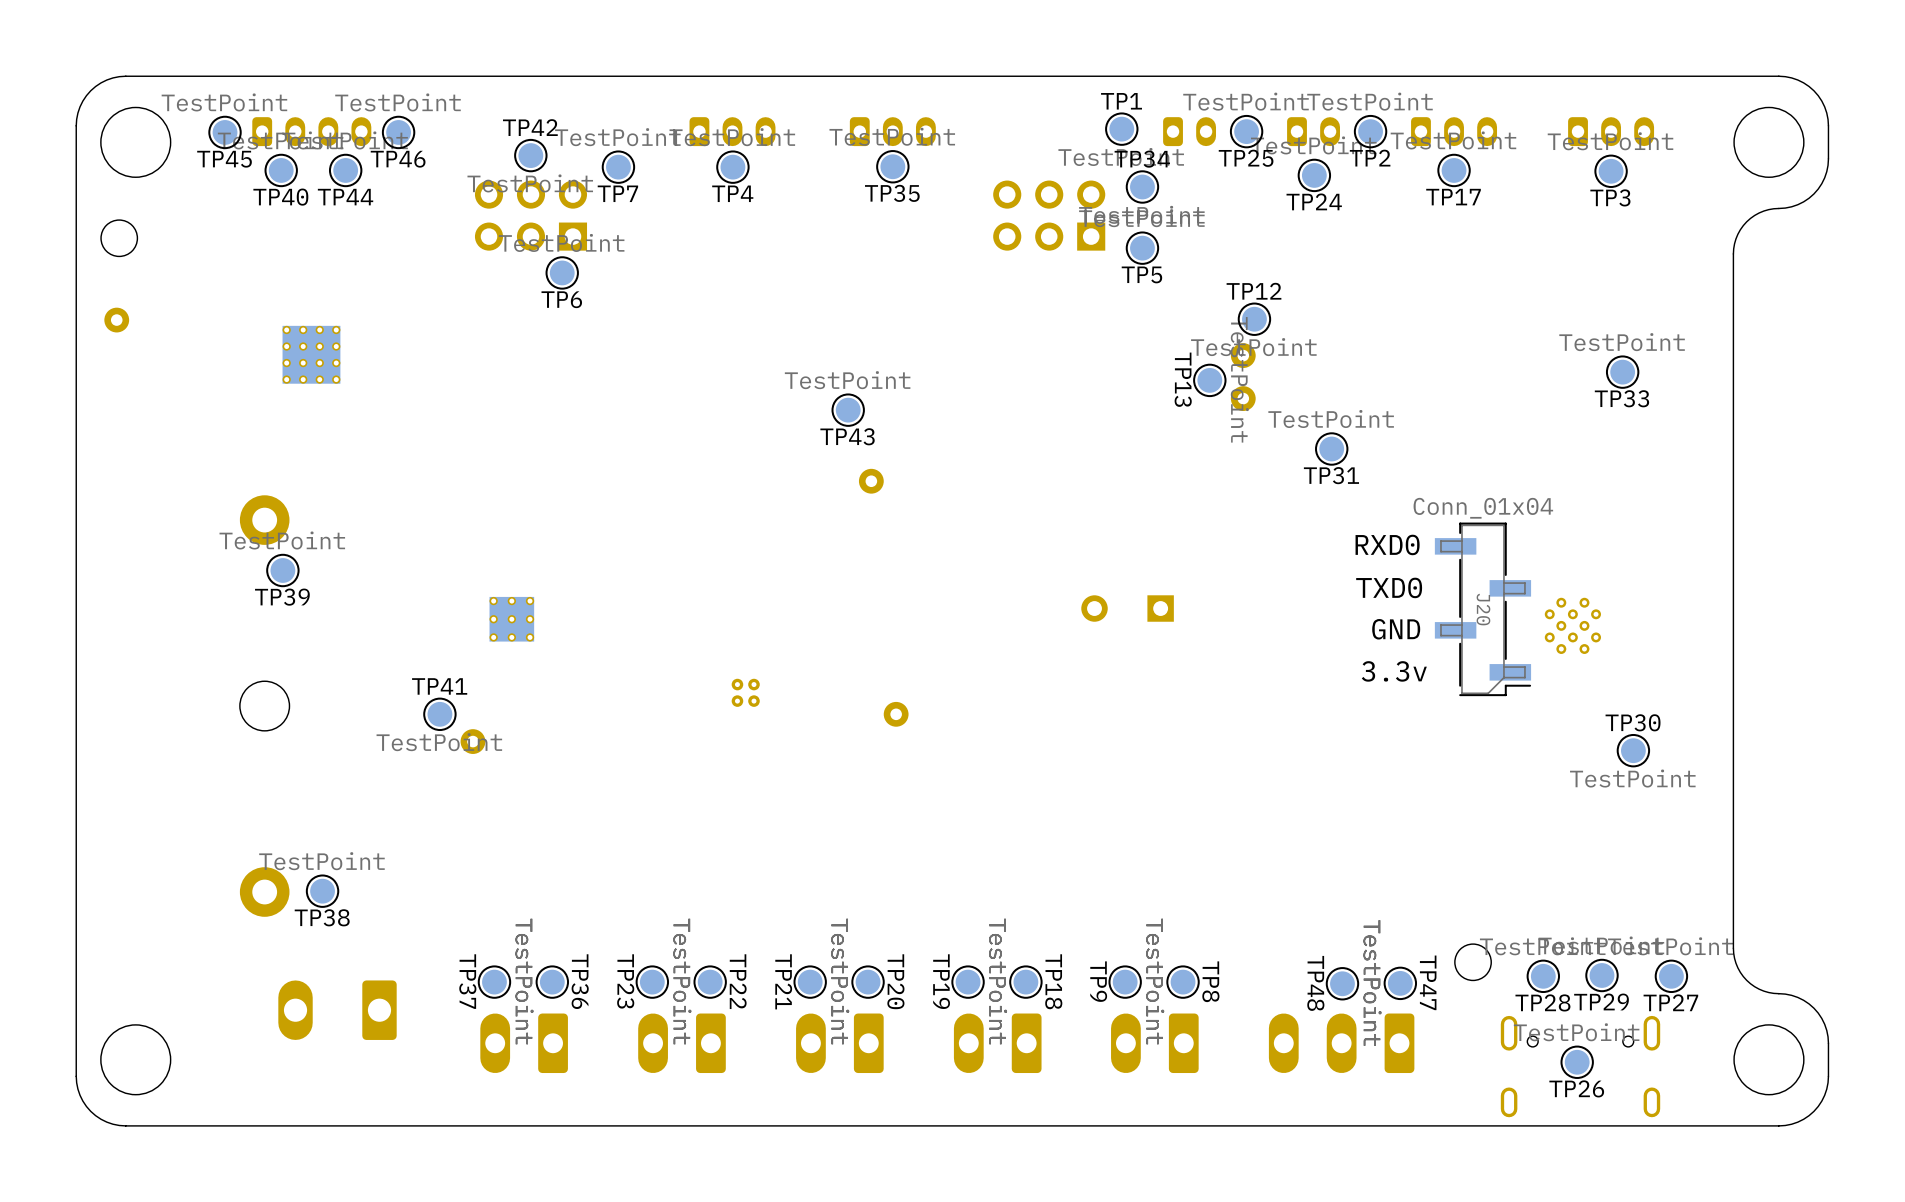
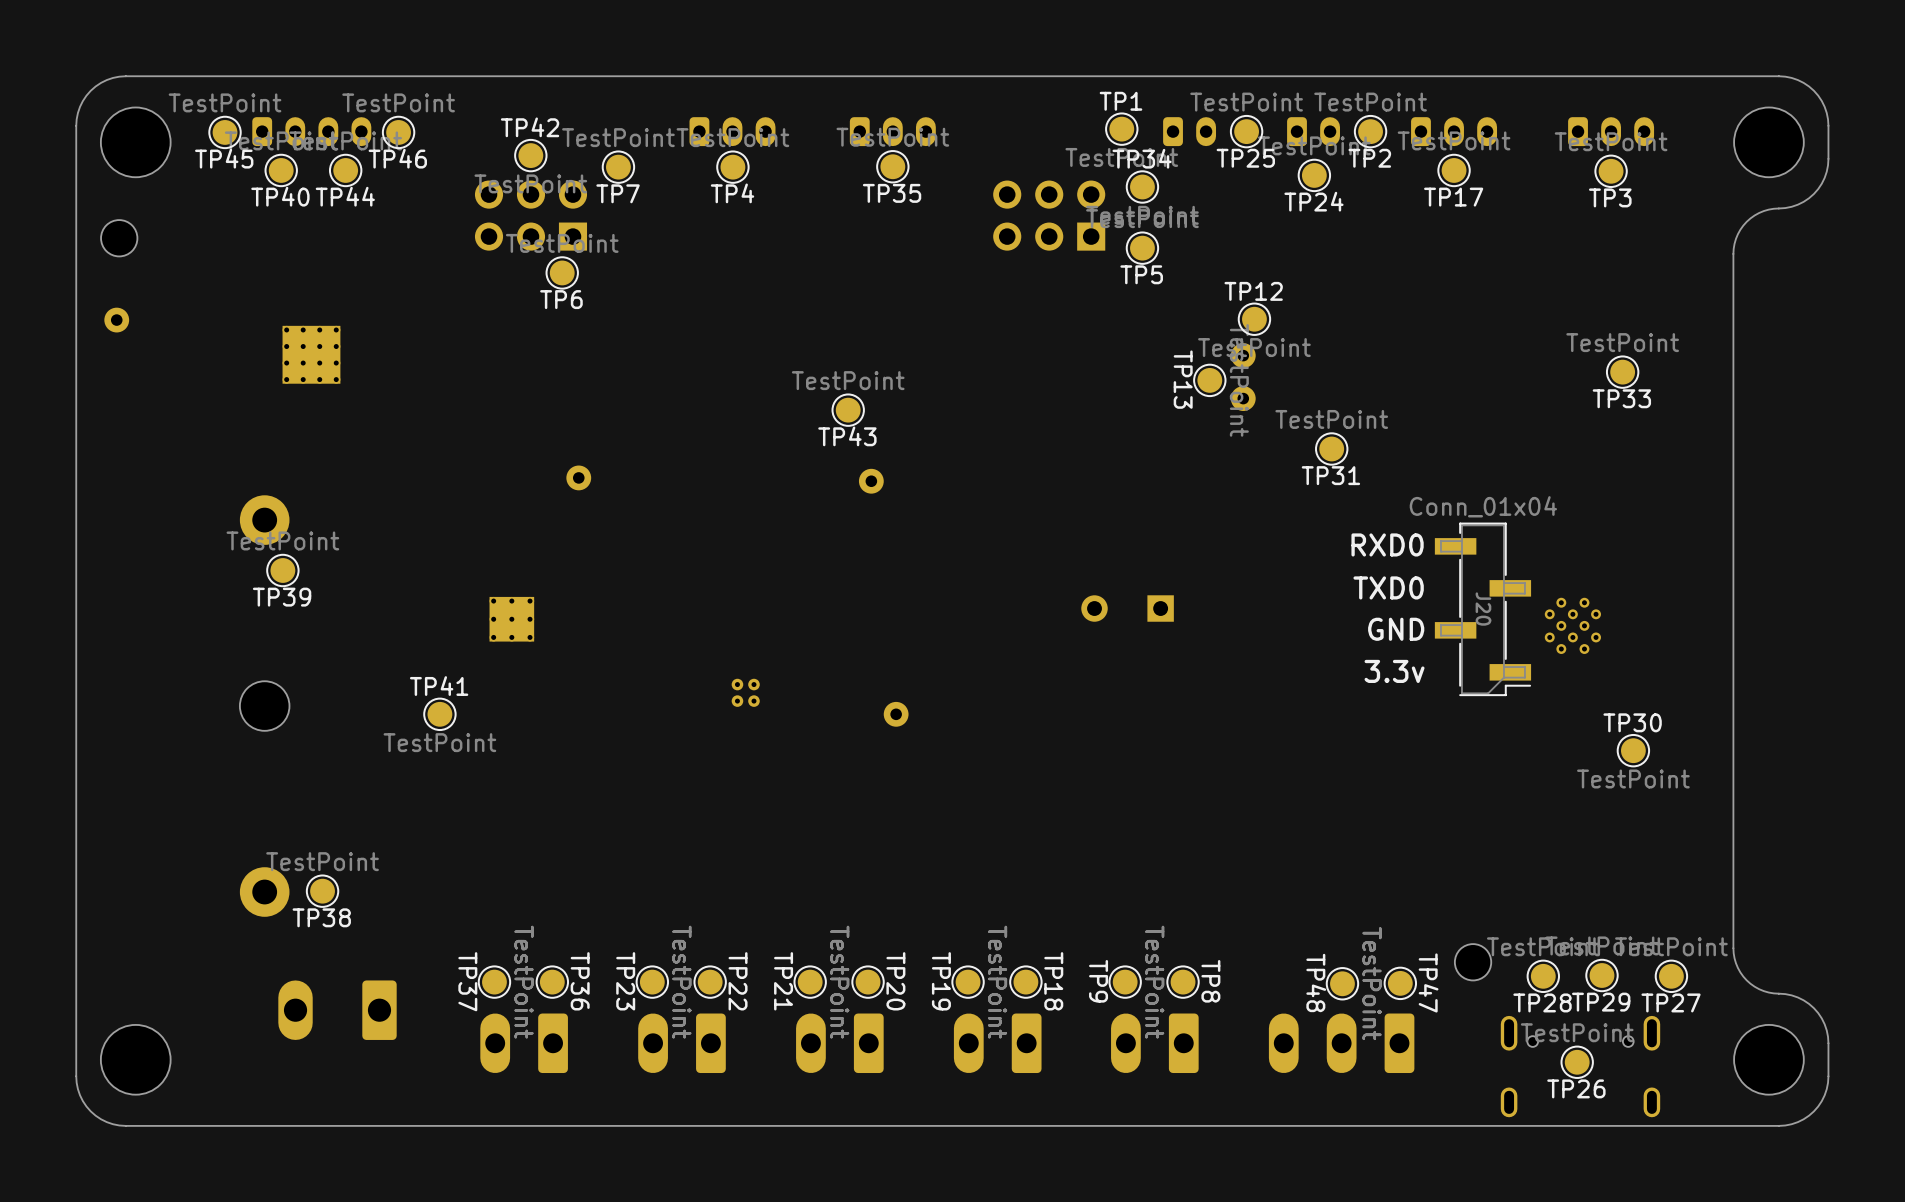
part position: (472, 741) -> (578, 477)

